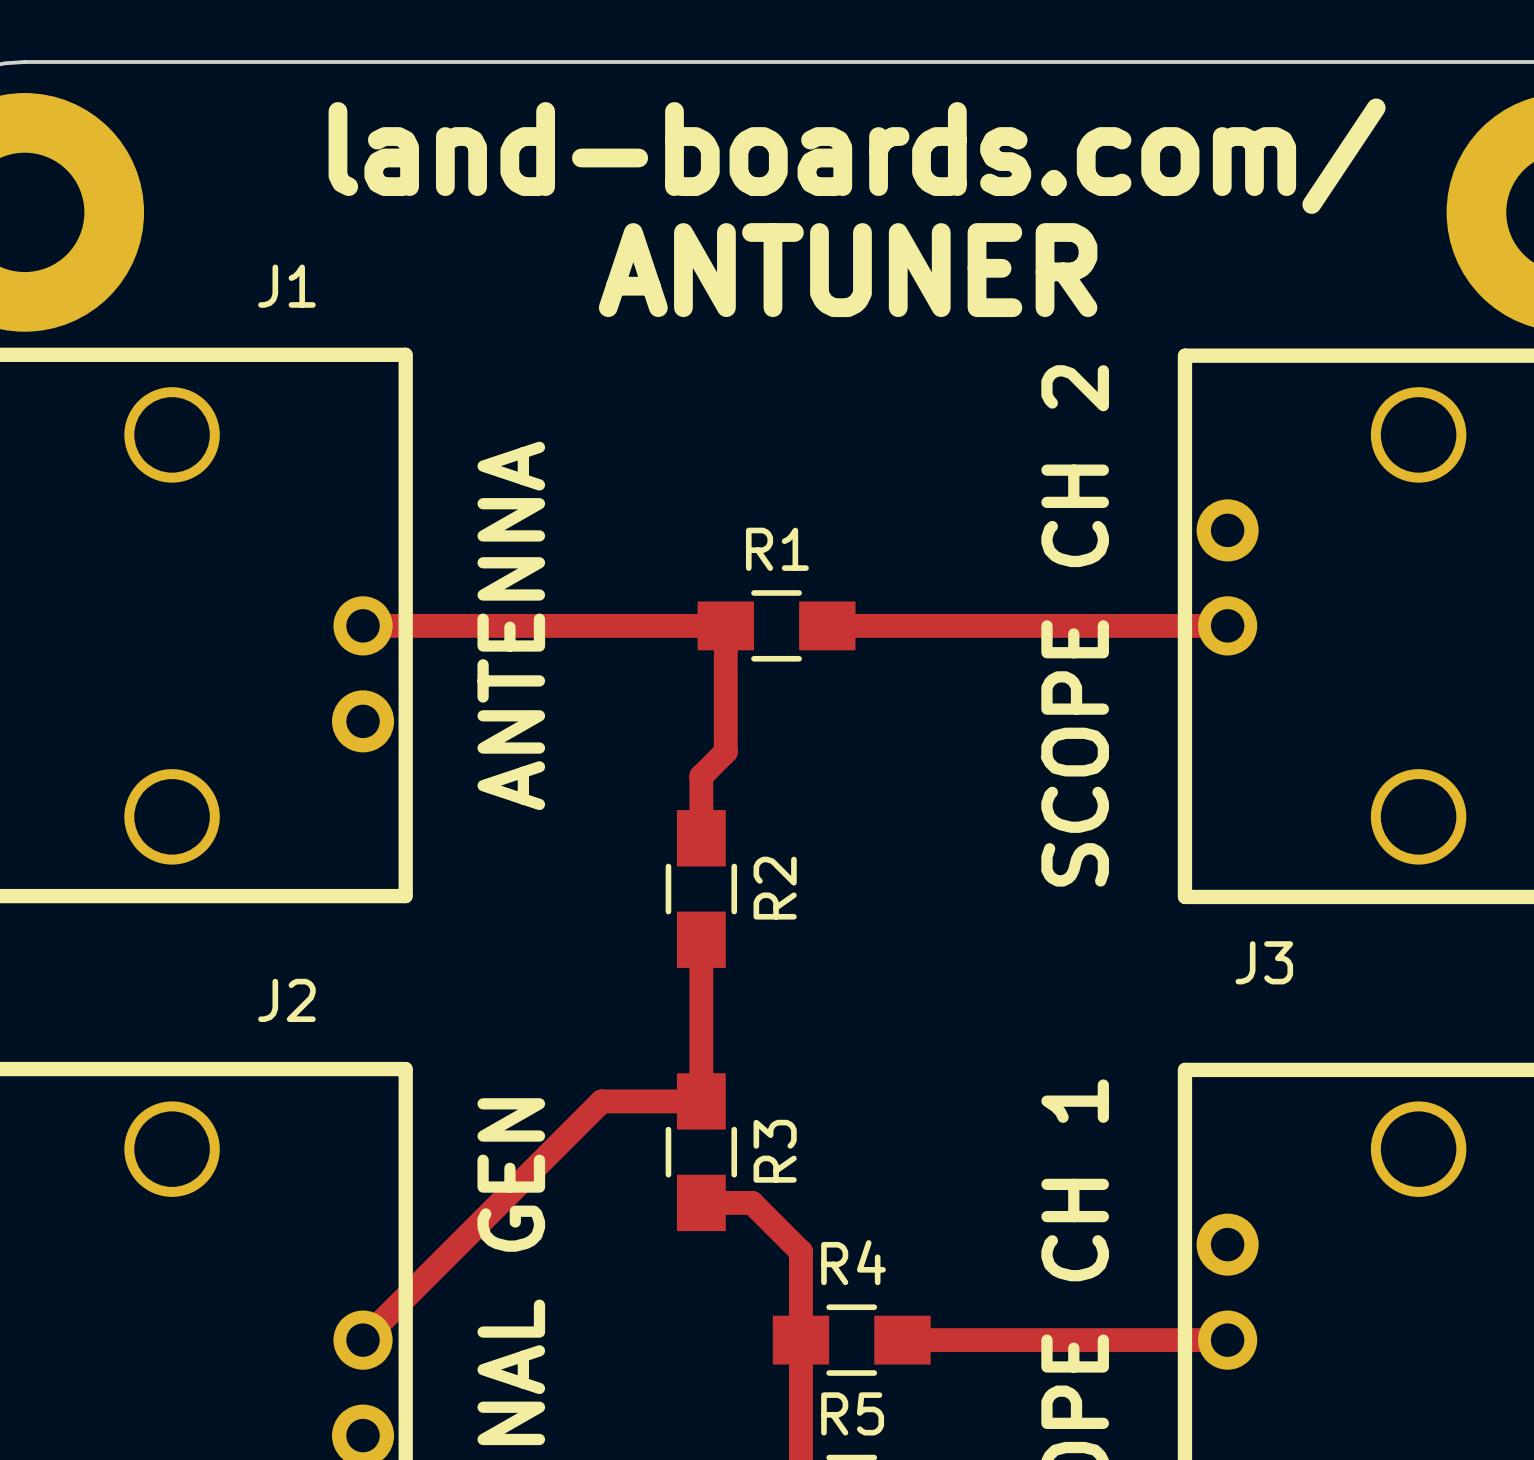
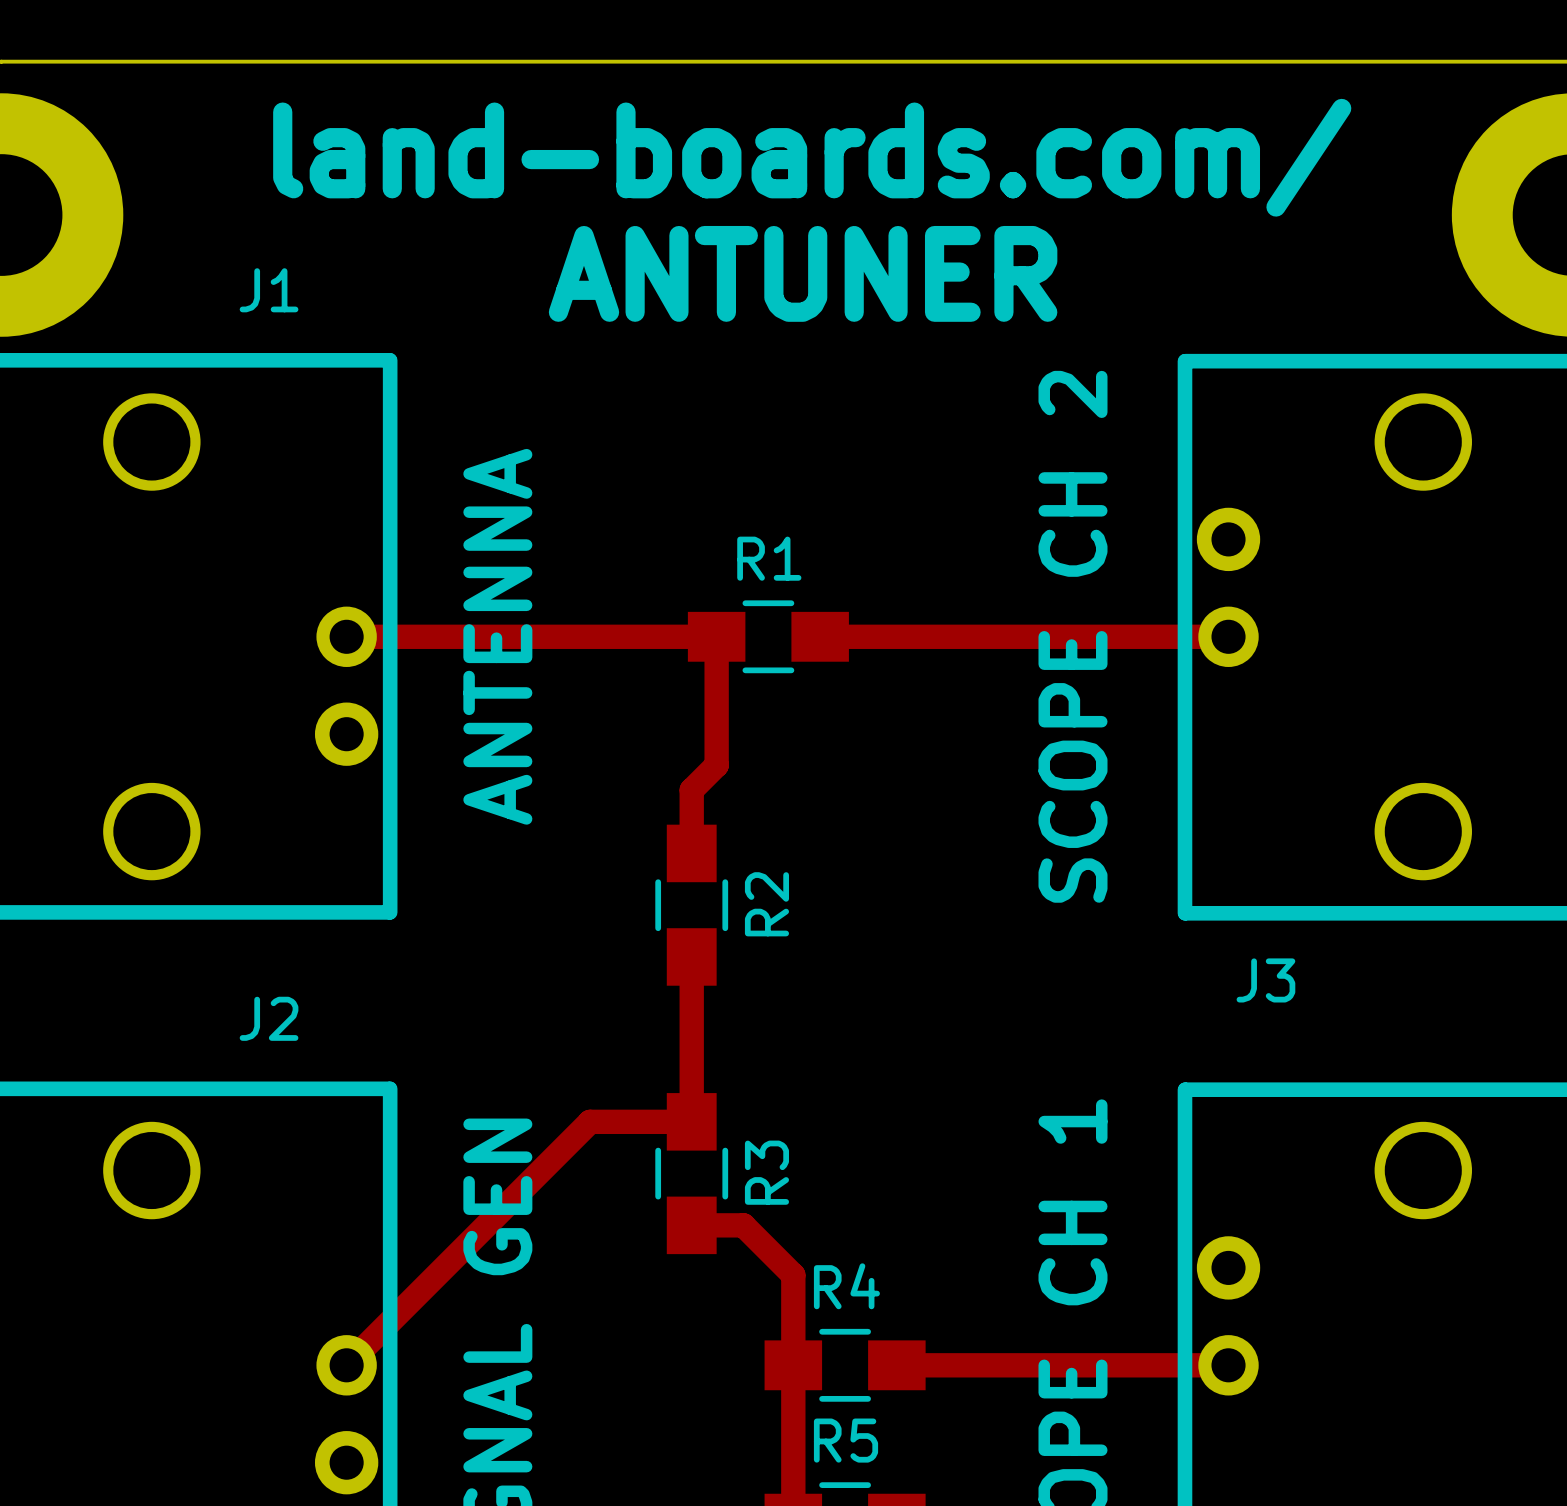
text position: land-boards.com/ (857, 156) -> land-boards.com/ (812, 157)
text position: ANTUNER (848, 270) -> ANTUNER (803, 273)

